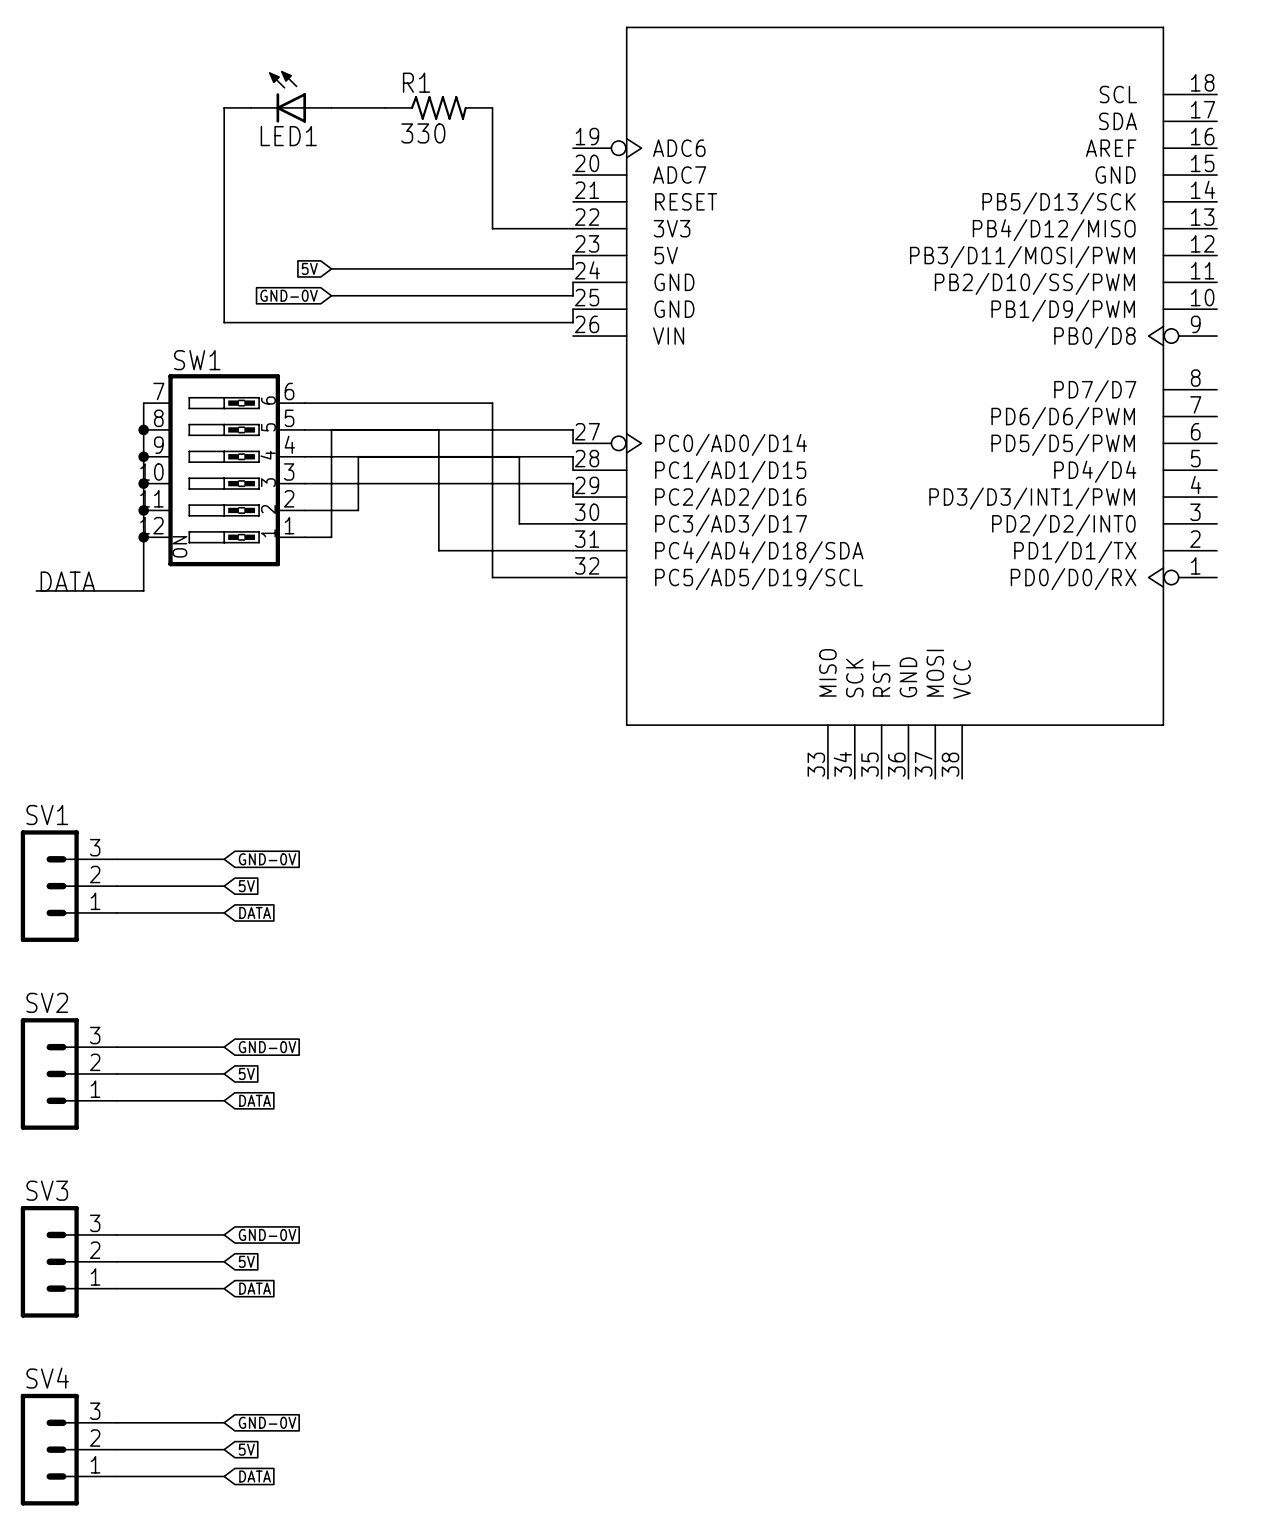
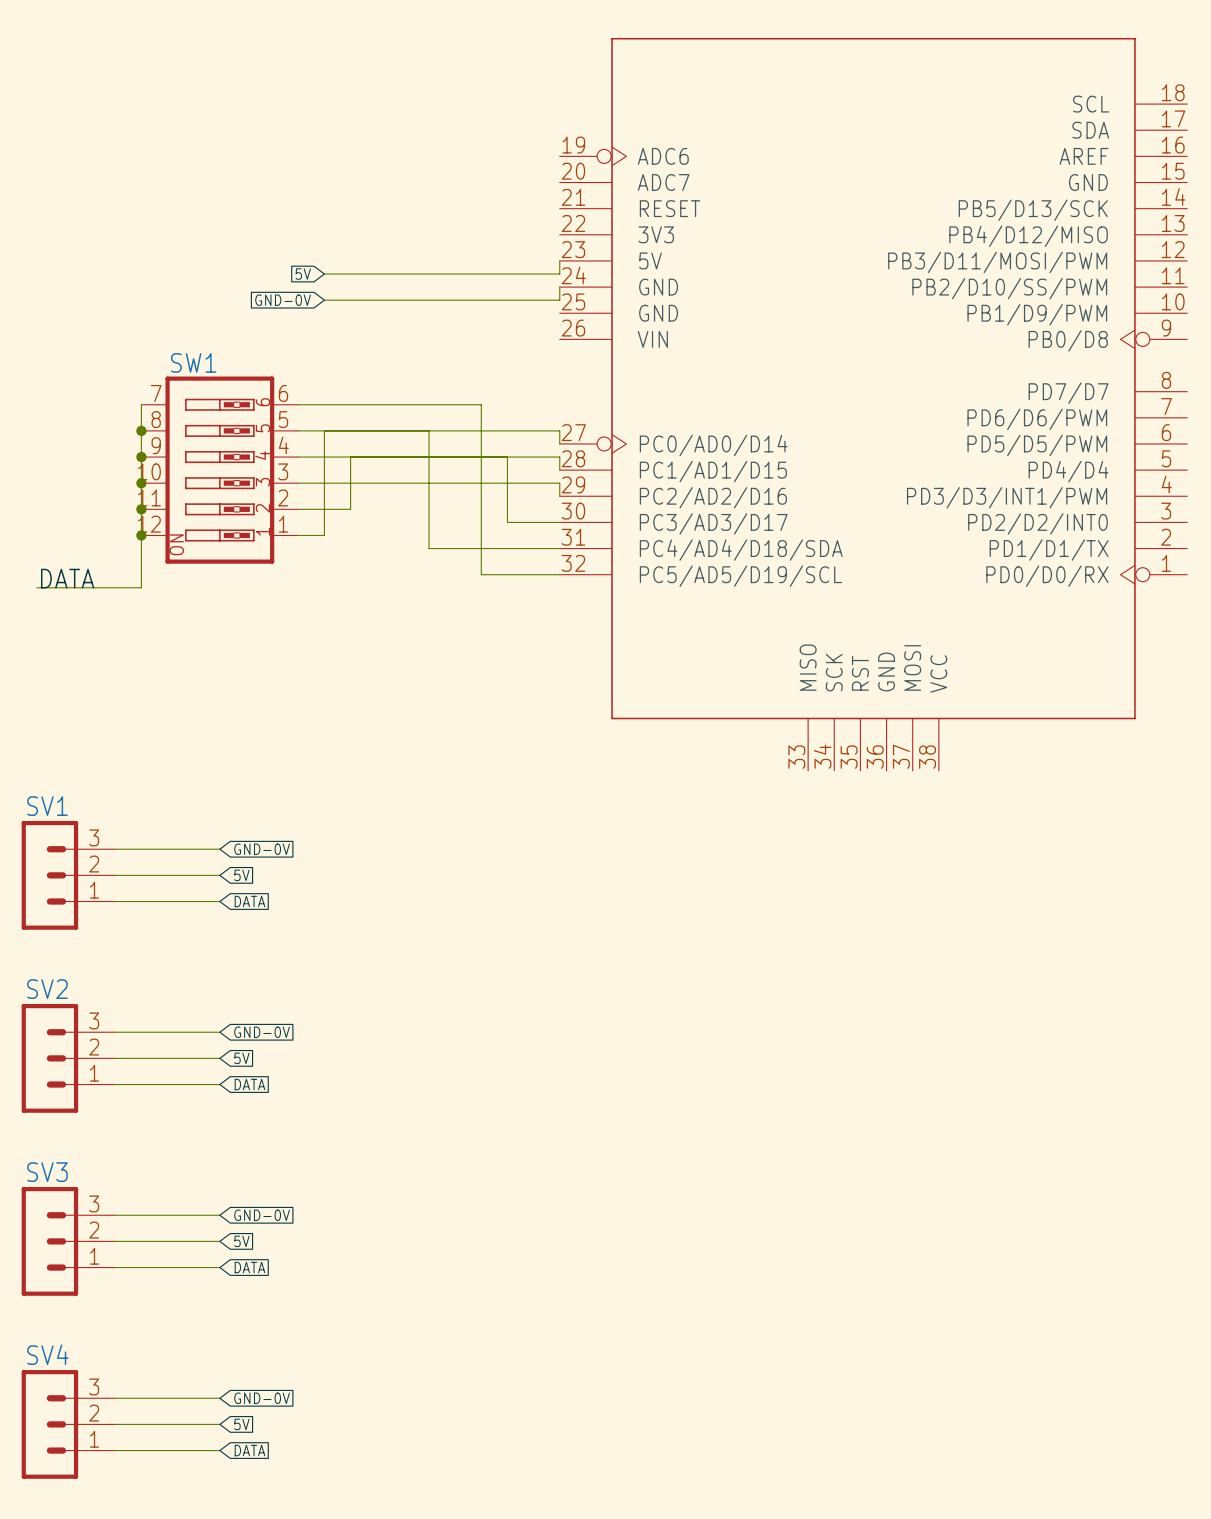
LED1: (291, 96) -> none
wire: (251, 107) (224, 107) (224, 322) (573, 322) (573, 309) -> none
wire: (331, 107) (385, 107) -> none
R1: 330 (438, 107) -> none
wire: (492, 107) (492, 228) (573, 228) -> none

